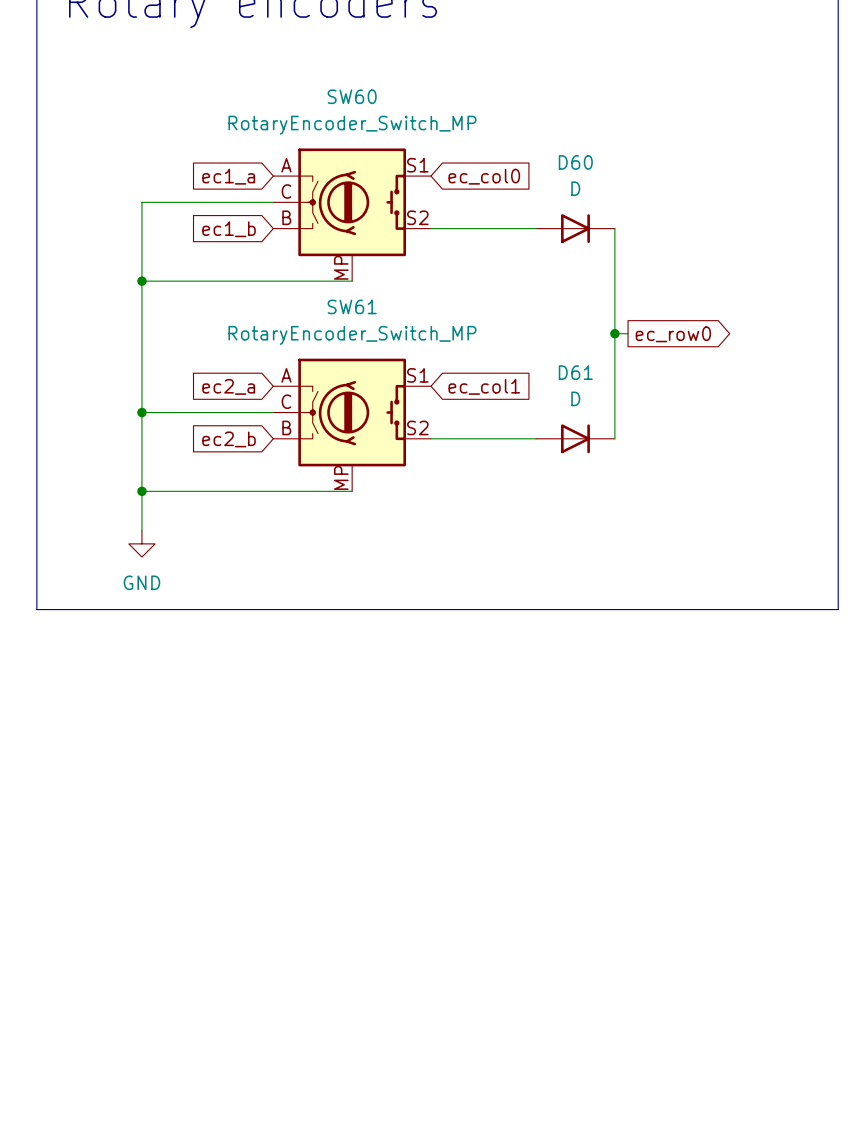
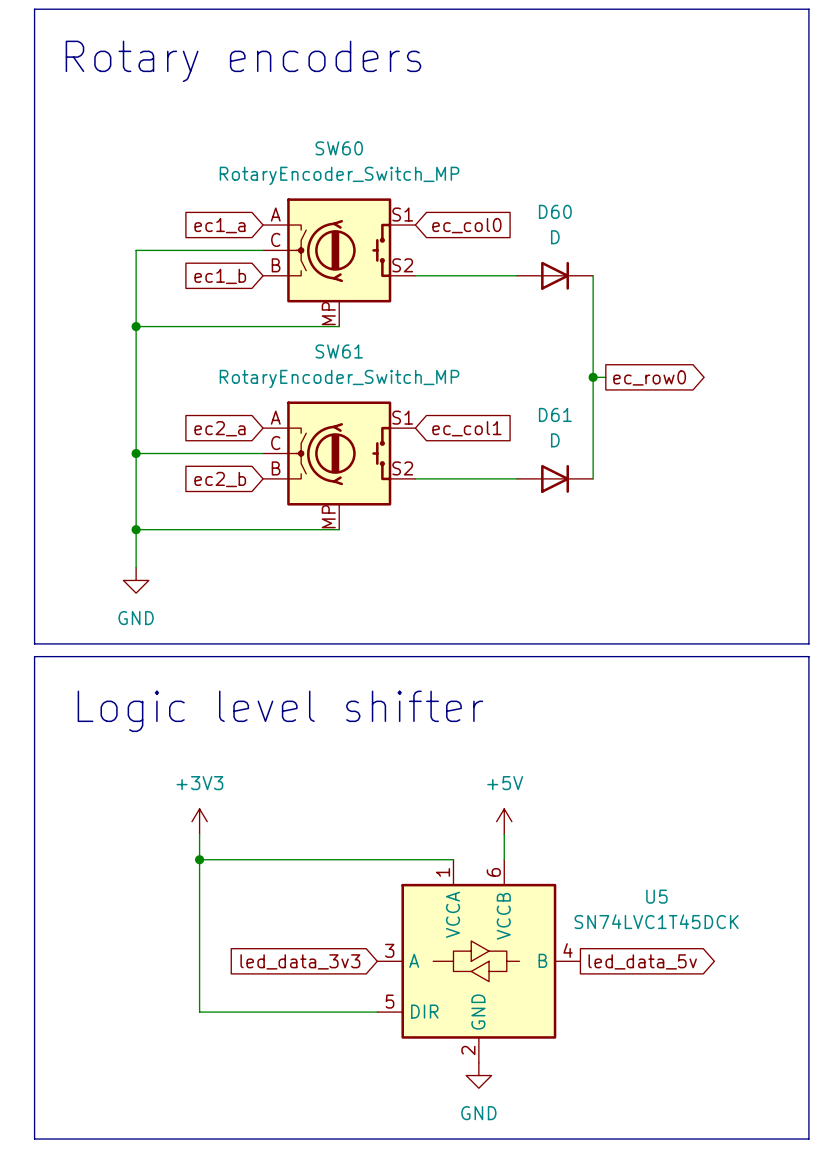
line: none -> (34, 656) (808, 656) (808, 1139) (34, 1139) (34, 656)
text: none -> Logic level shifter (280, 711)
power symbol: none -> +3V3 (199, 821)
power symbol: none -> +5V (504, 821)
wire: none -> (199, 834) (199, 1012) (377, 1012)
wire: none -> (504, 834) (504, 859)
wire: none -> (199, 859) (453, 859)
junction: none -> (199, 859)
U5: none -> SN74LVC1T45DCK (478, 961)
global label: none -> led_data_3v3 (300, 961)
global label: none -> led_data_5v (642, 961)
power symbol: none -> GND (478, 1075)

